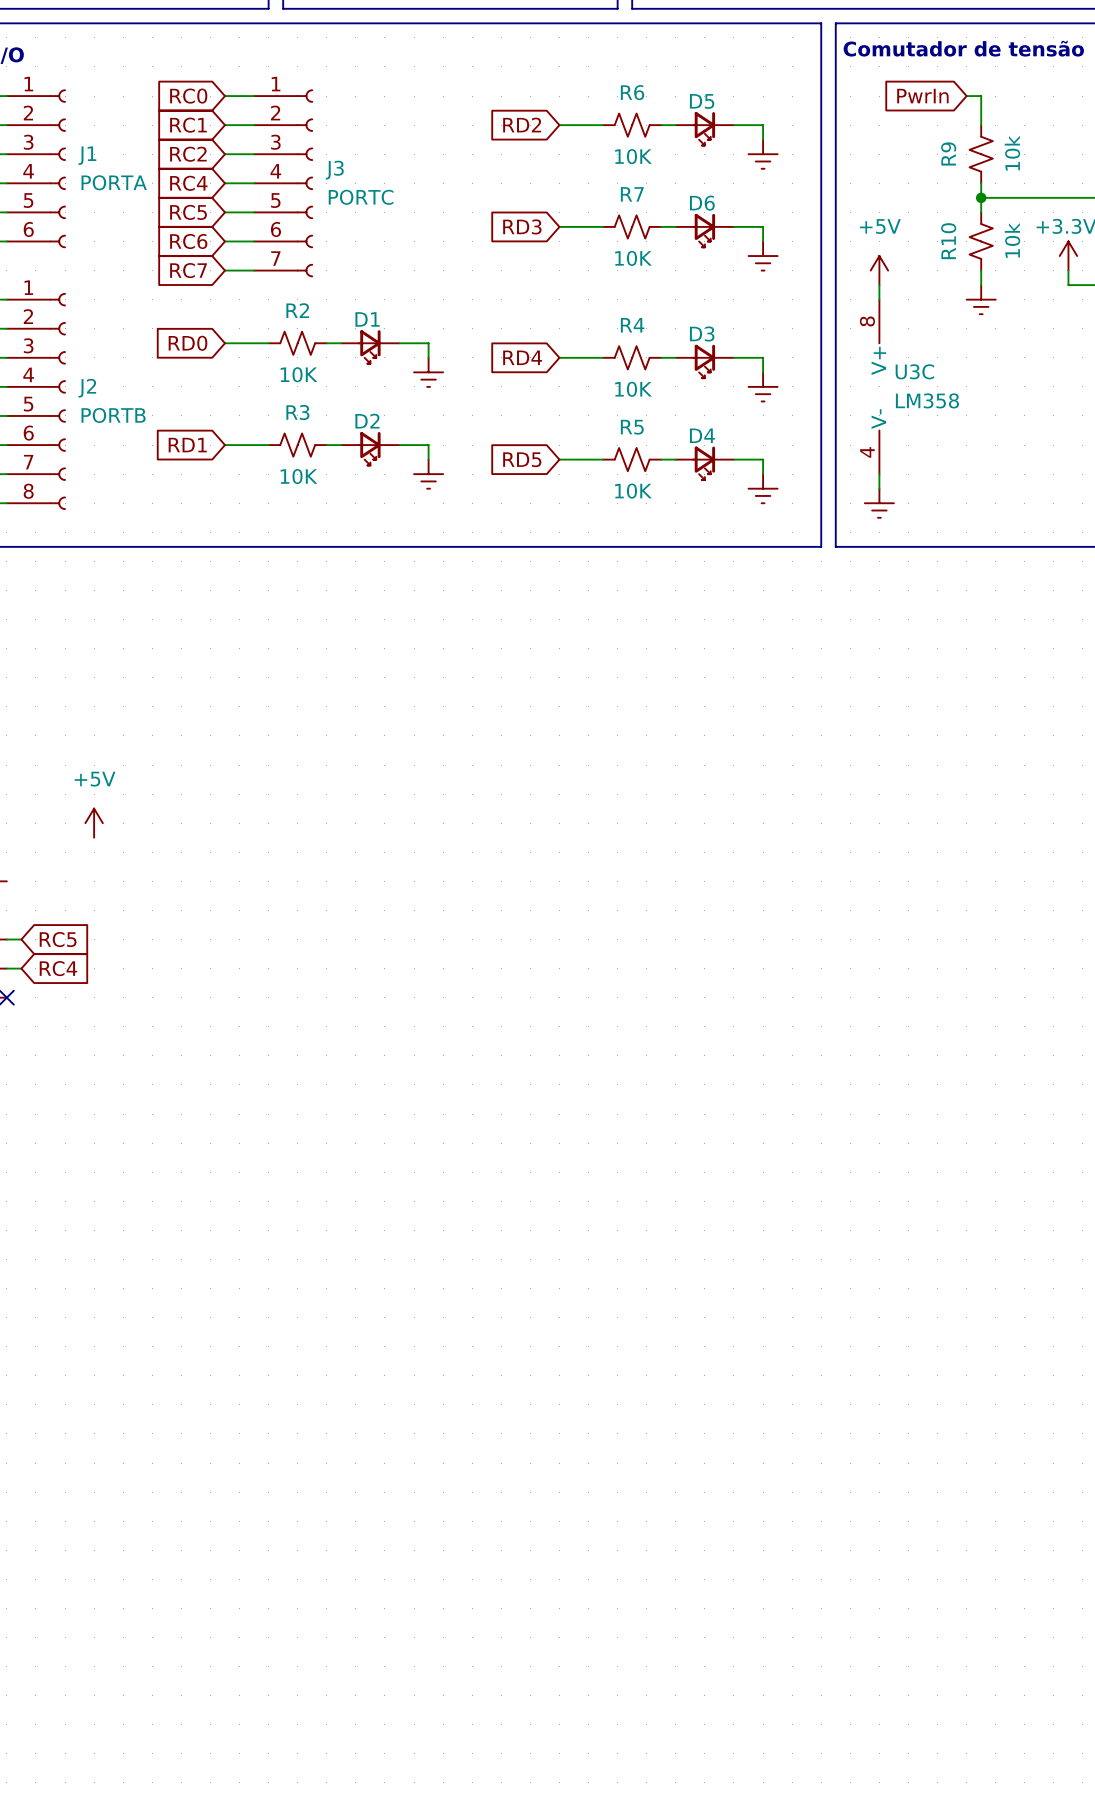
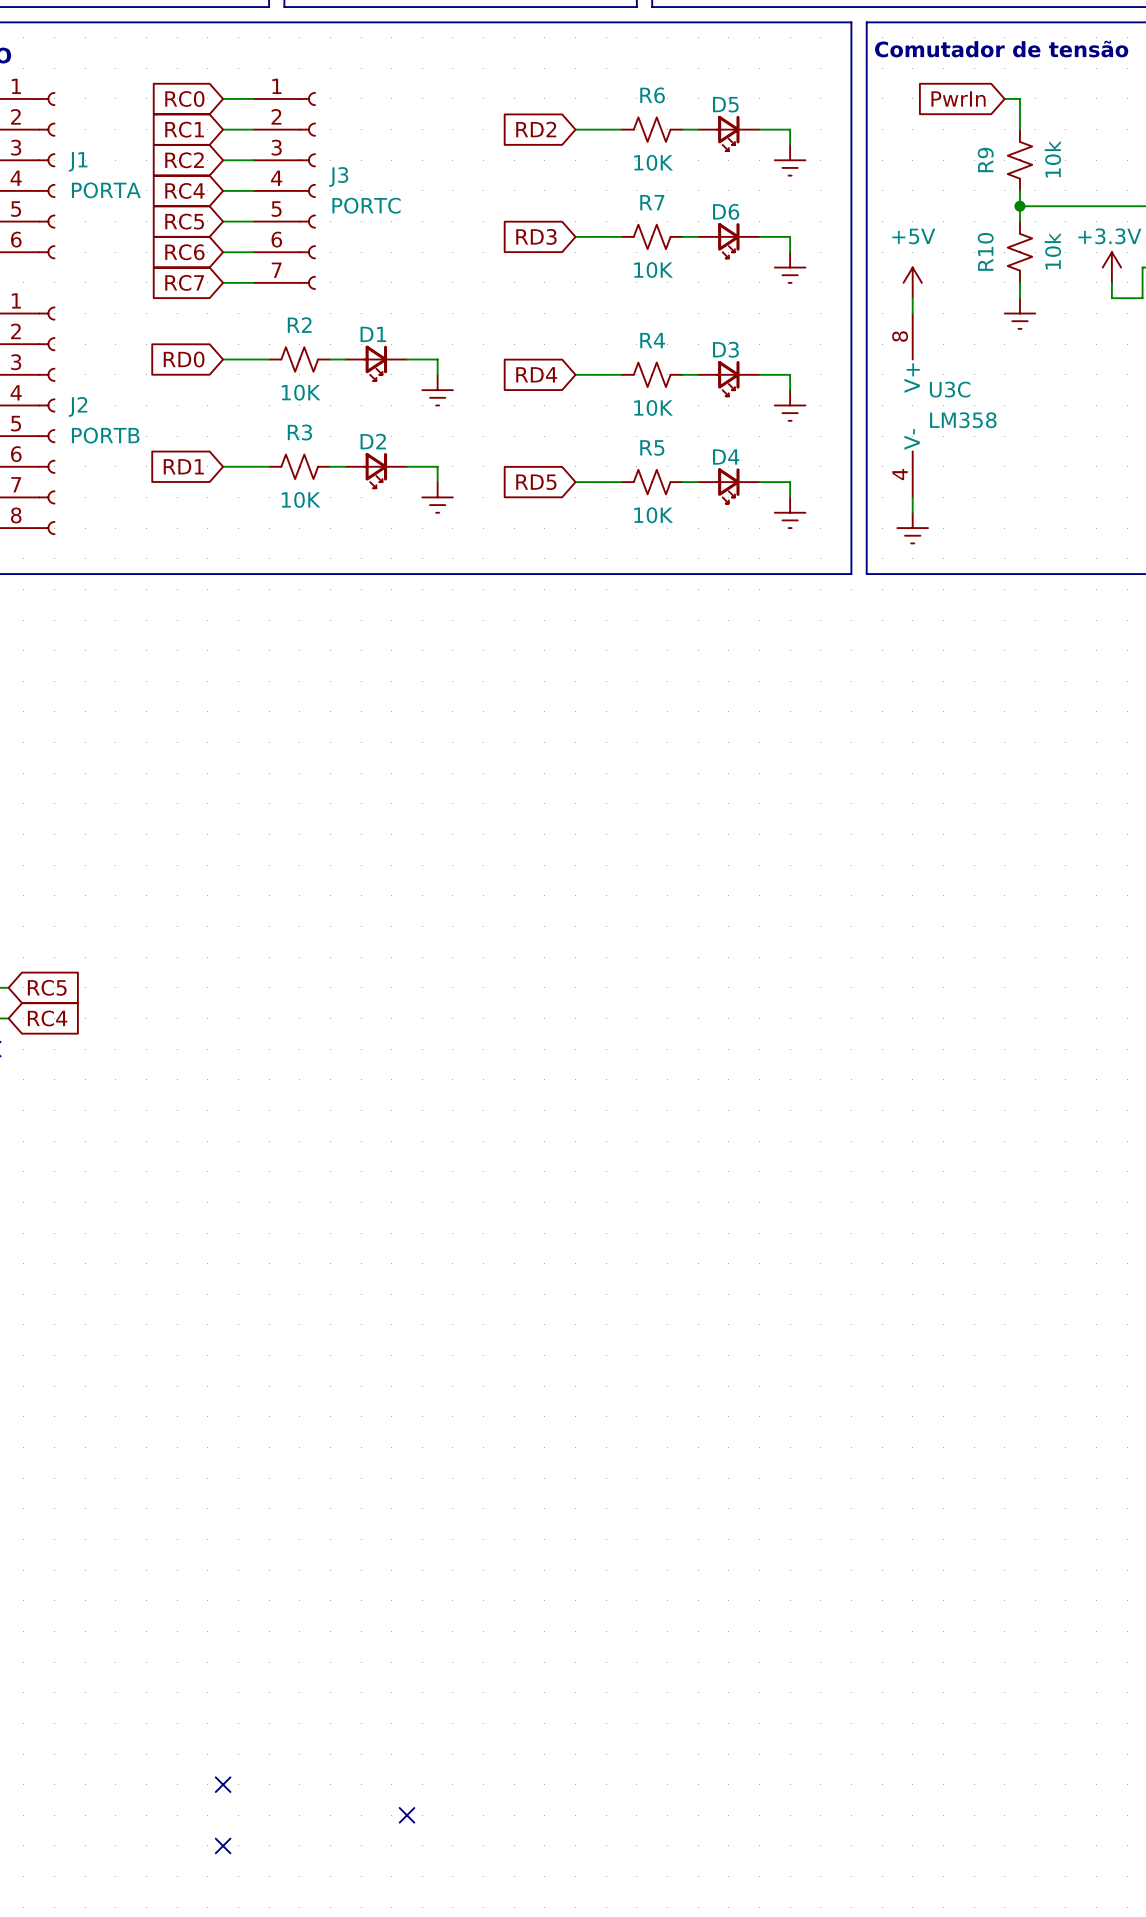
power symbol: +5V (94, 823) -> none
no-connect mark: none -> (223, 1784)
no-connect mark: none -> (406, 1815)
no-connect mark: none -> (223, 1845)

